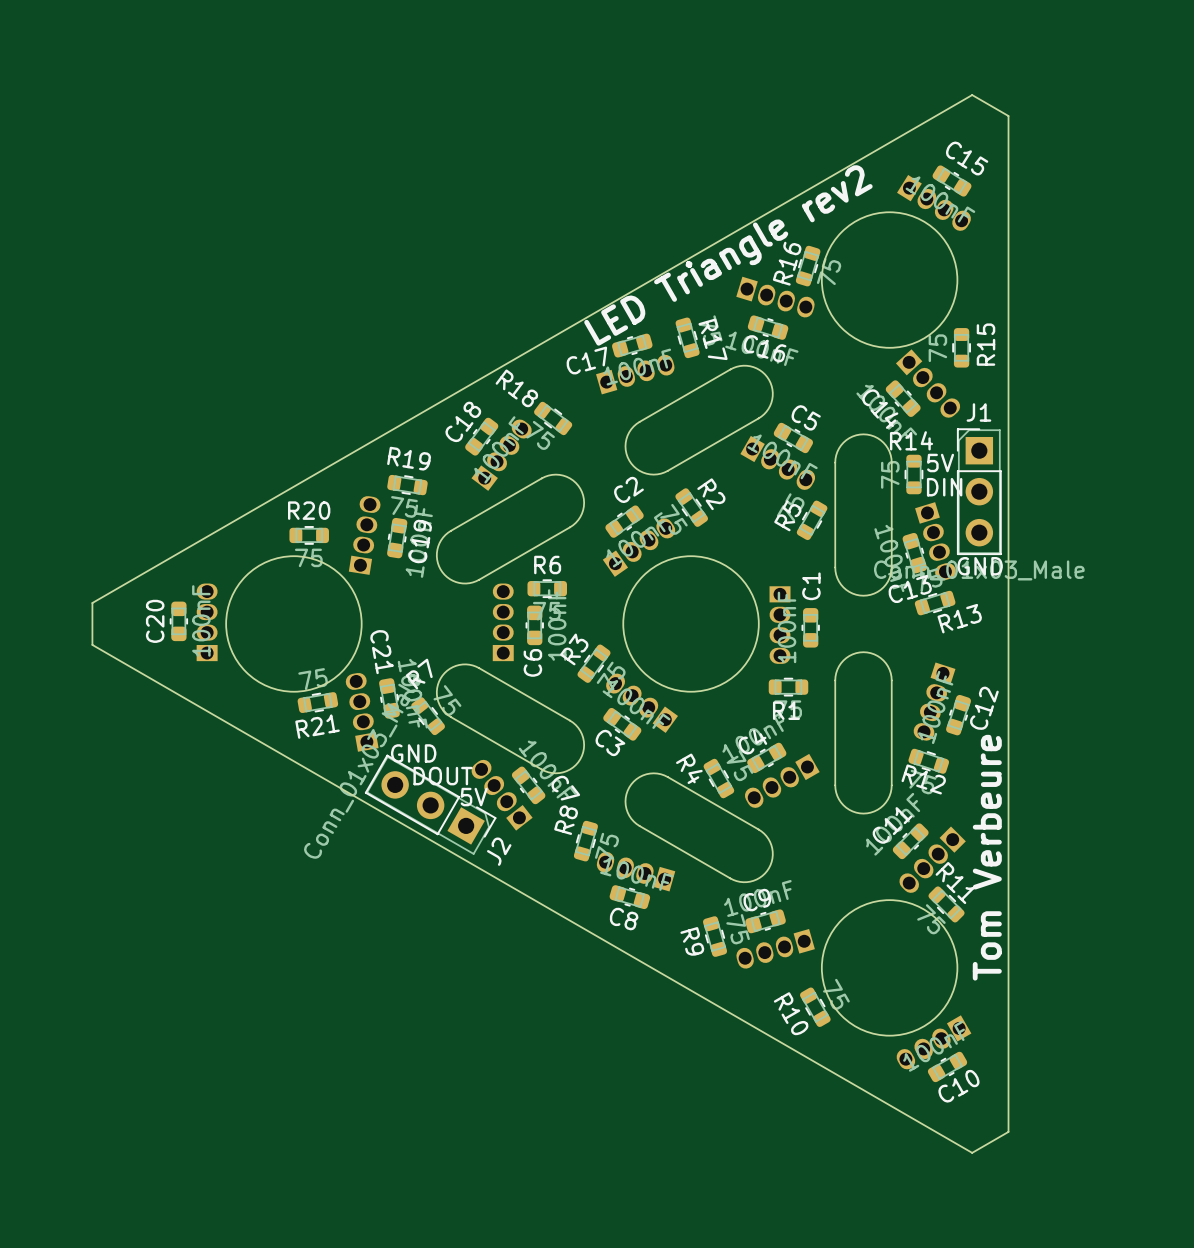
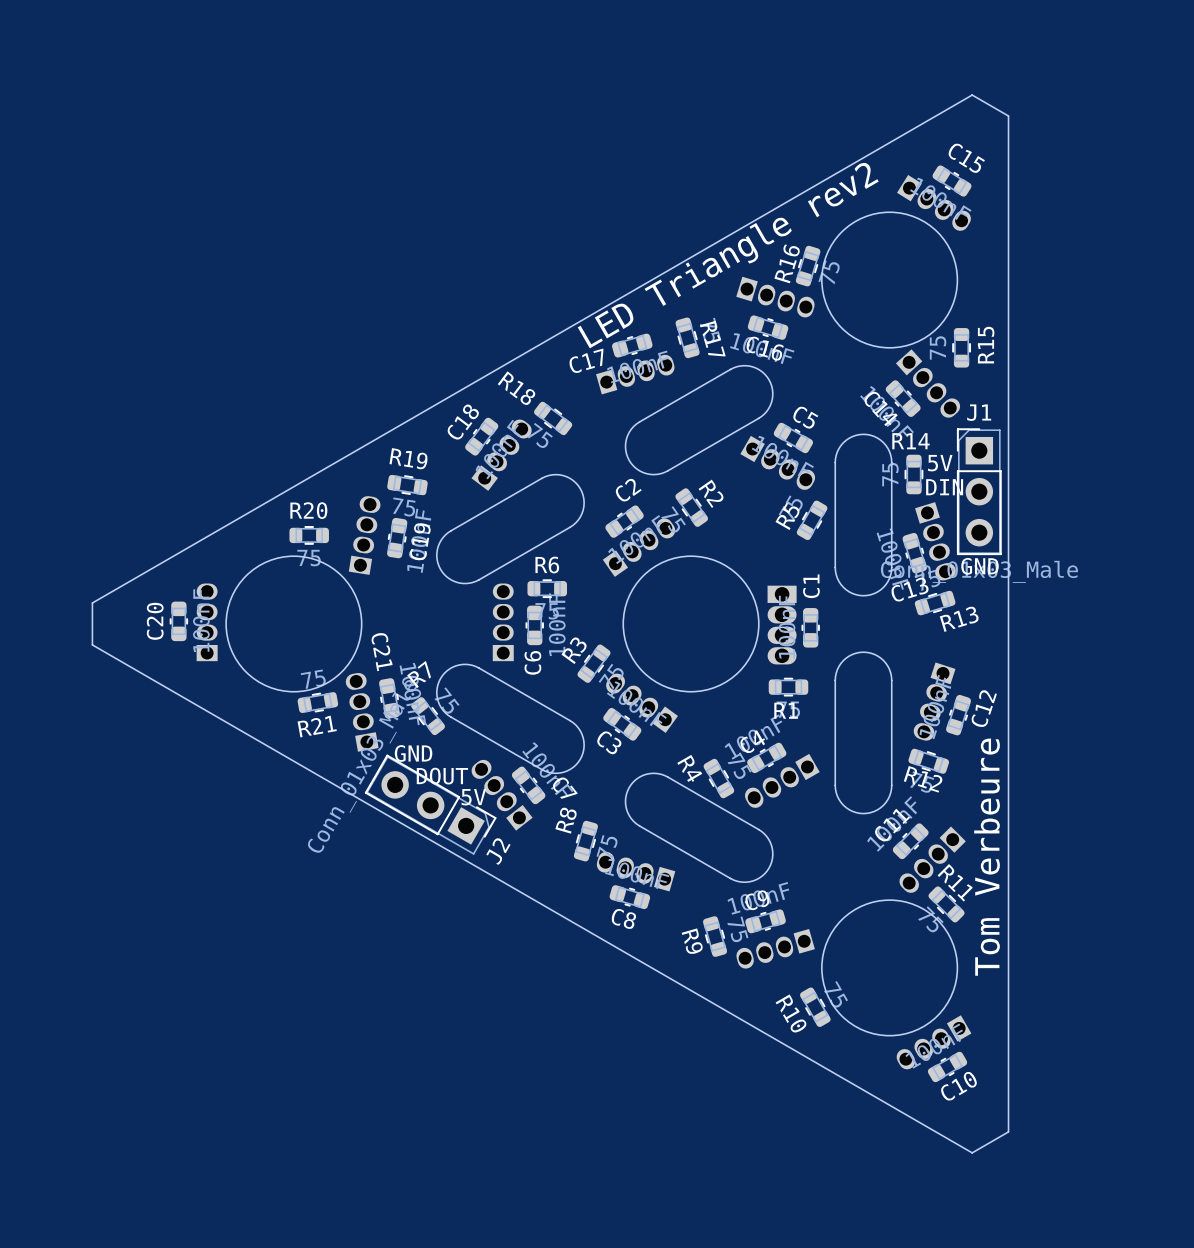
part footprint: [769, 586, 791, 664] -> [767, 585, 797, 665]

